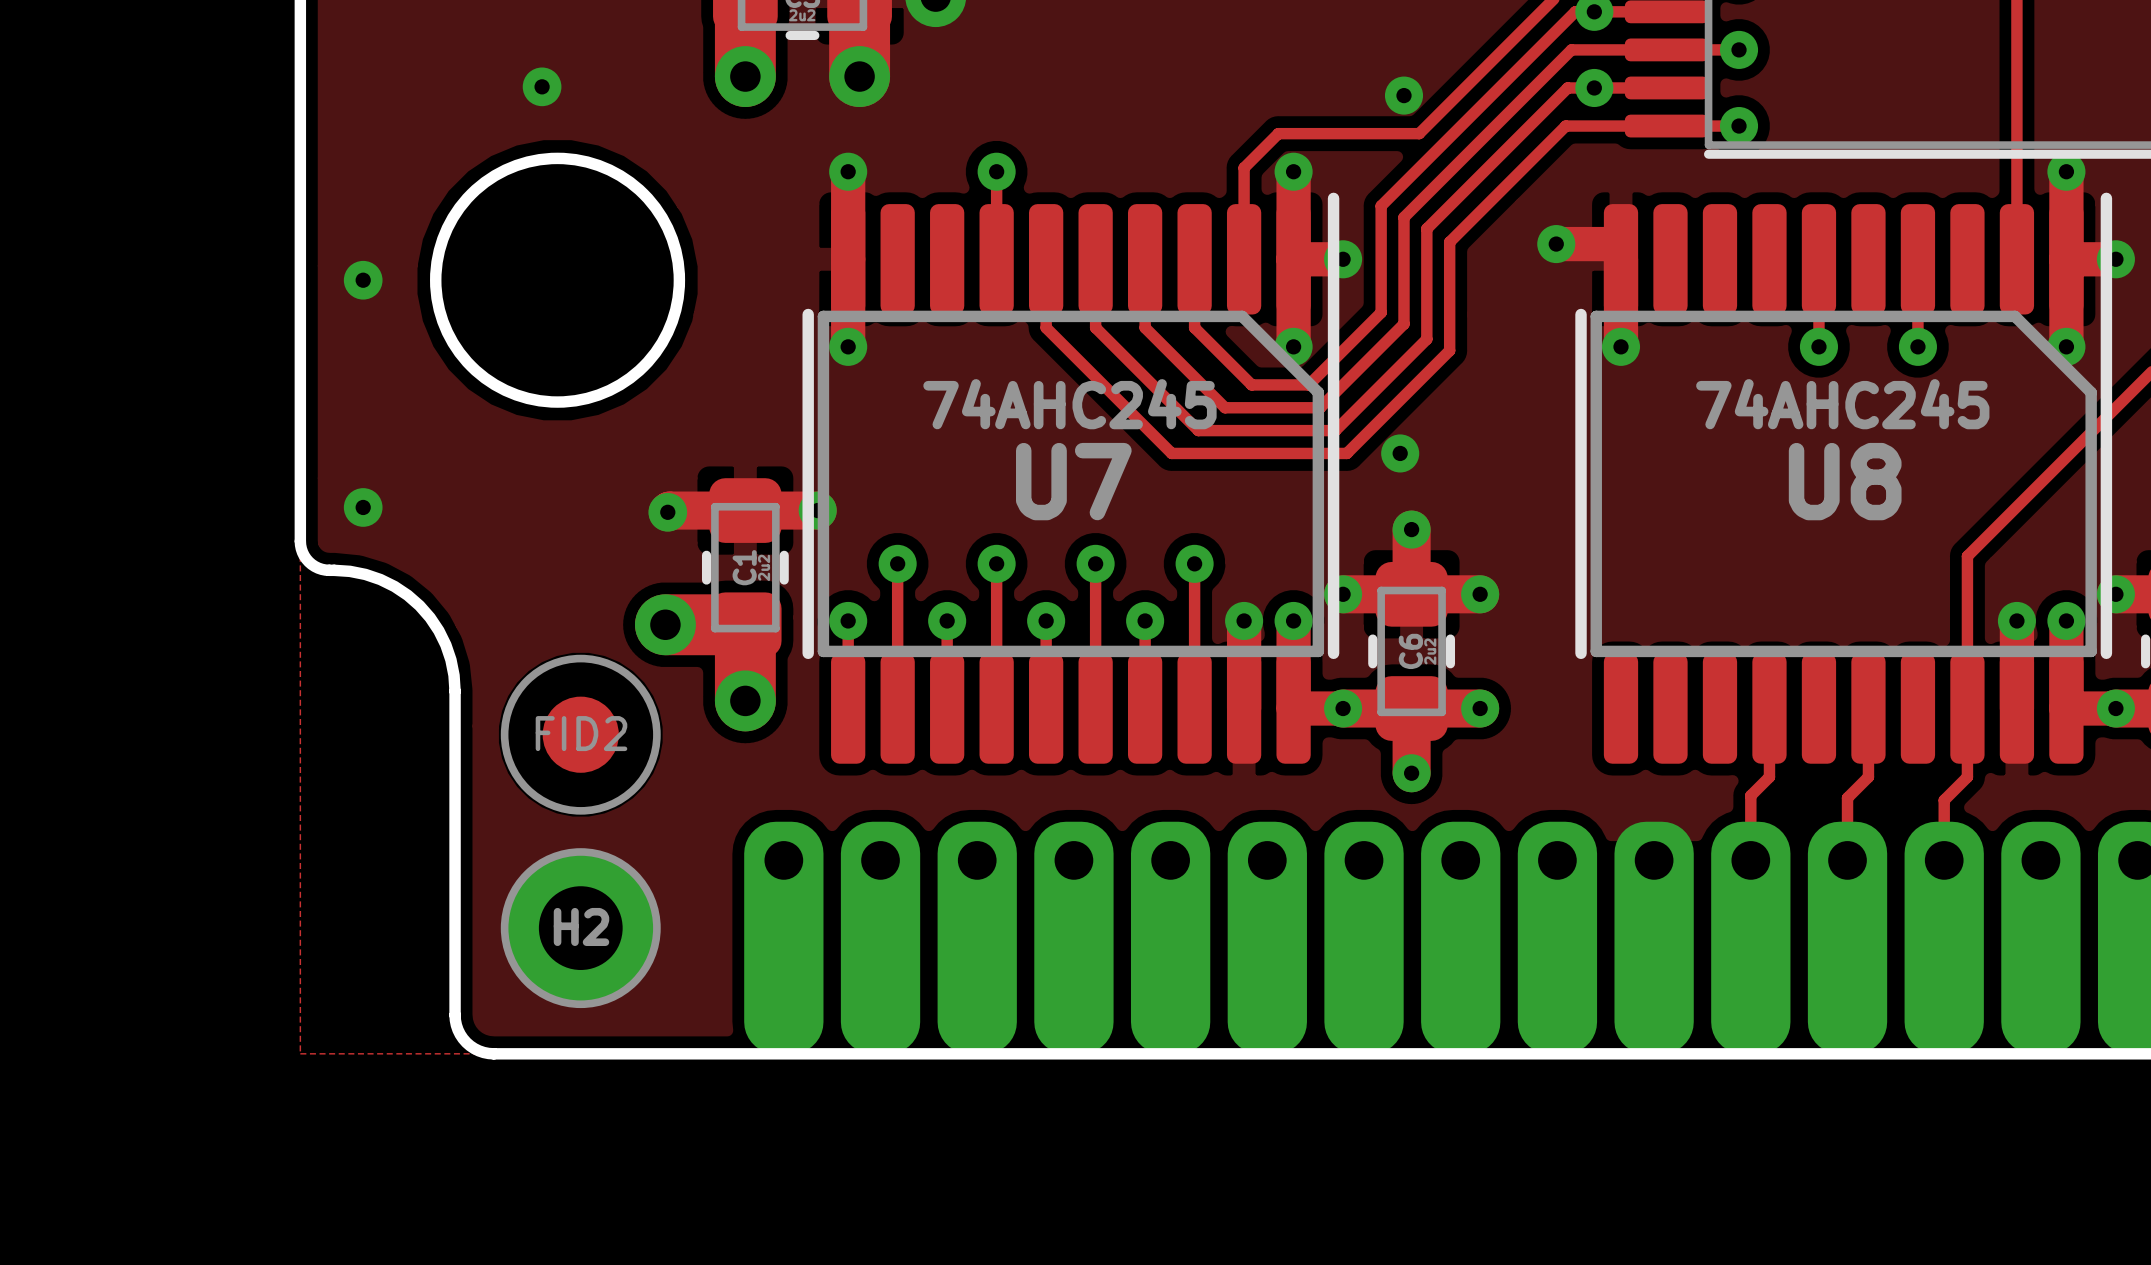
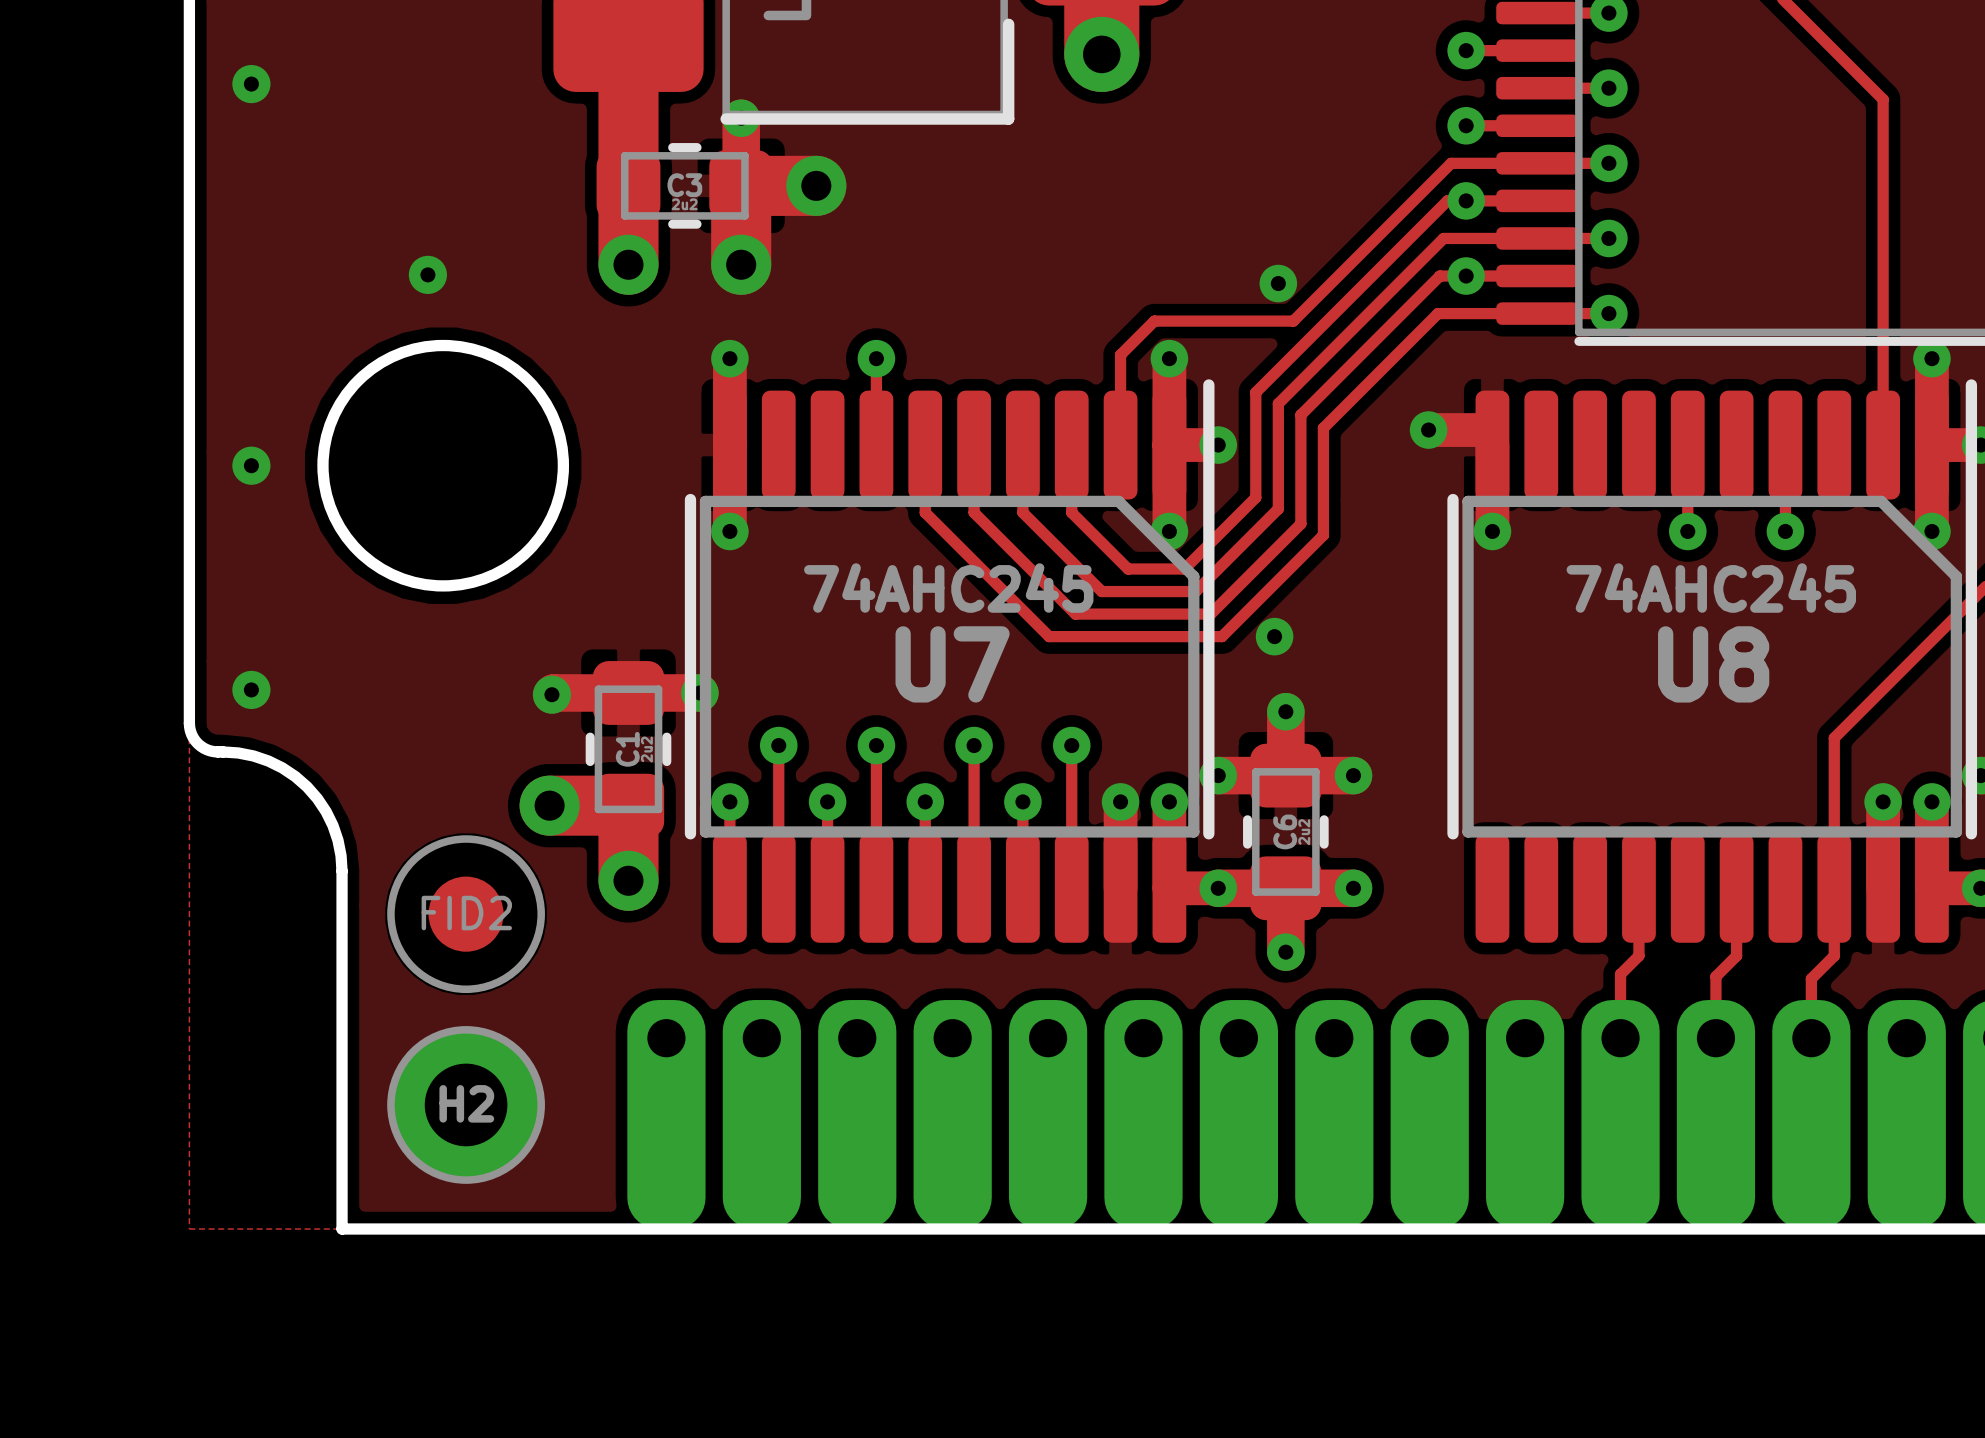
board edge: (455, 1015) (458, 1029) (466, 1042) (478, 1050) (493, 1053) -> (342, 1190) (342, 1229) (380, 1229)

